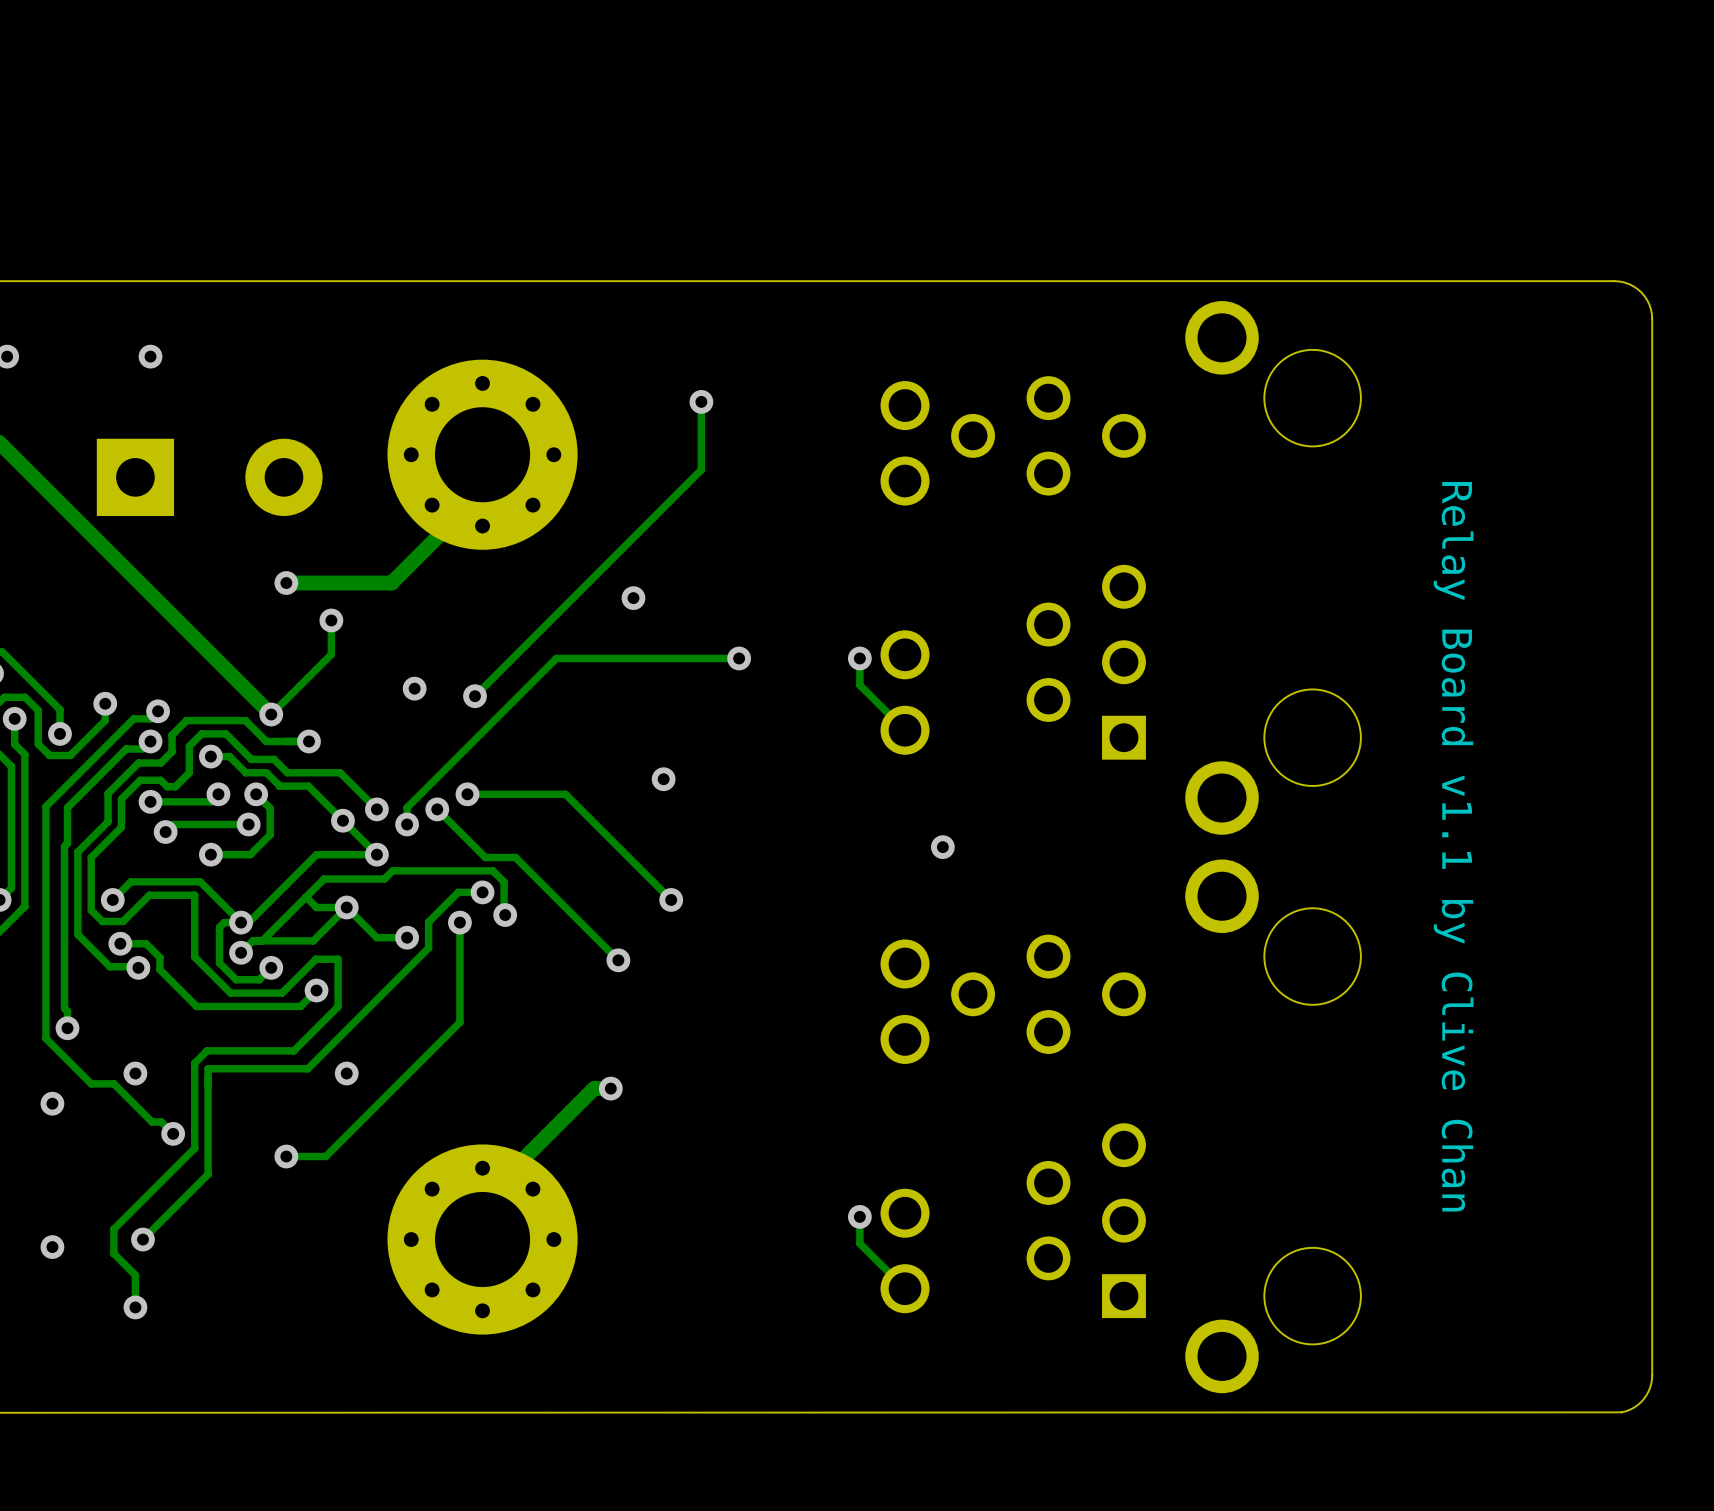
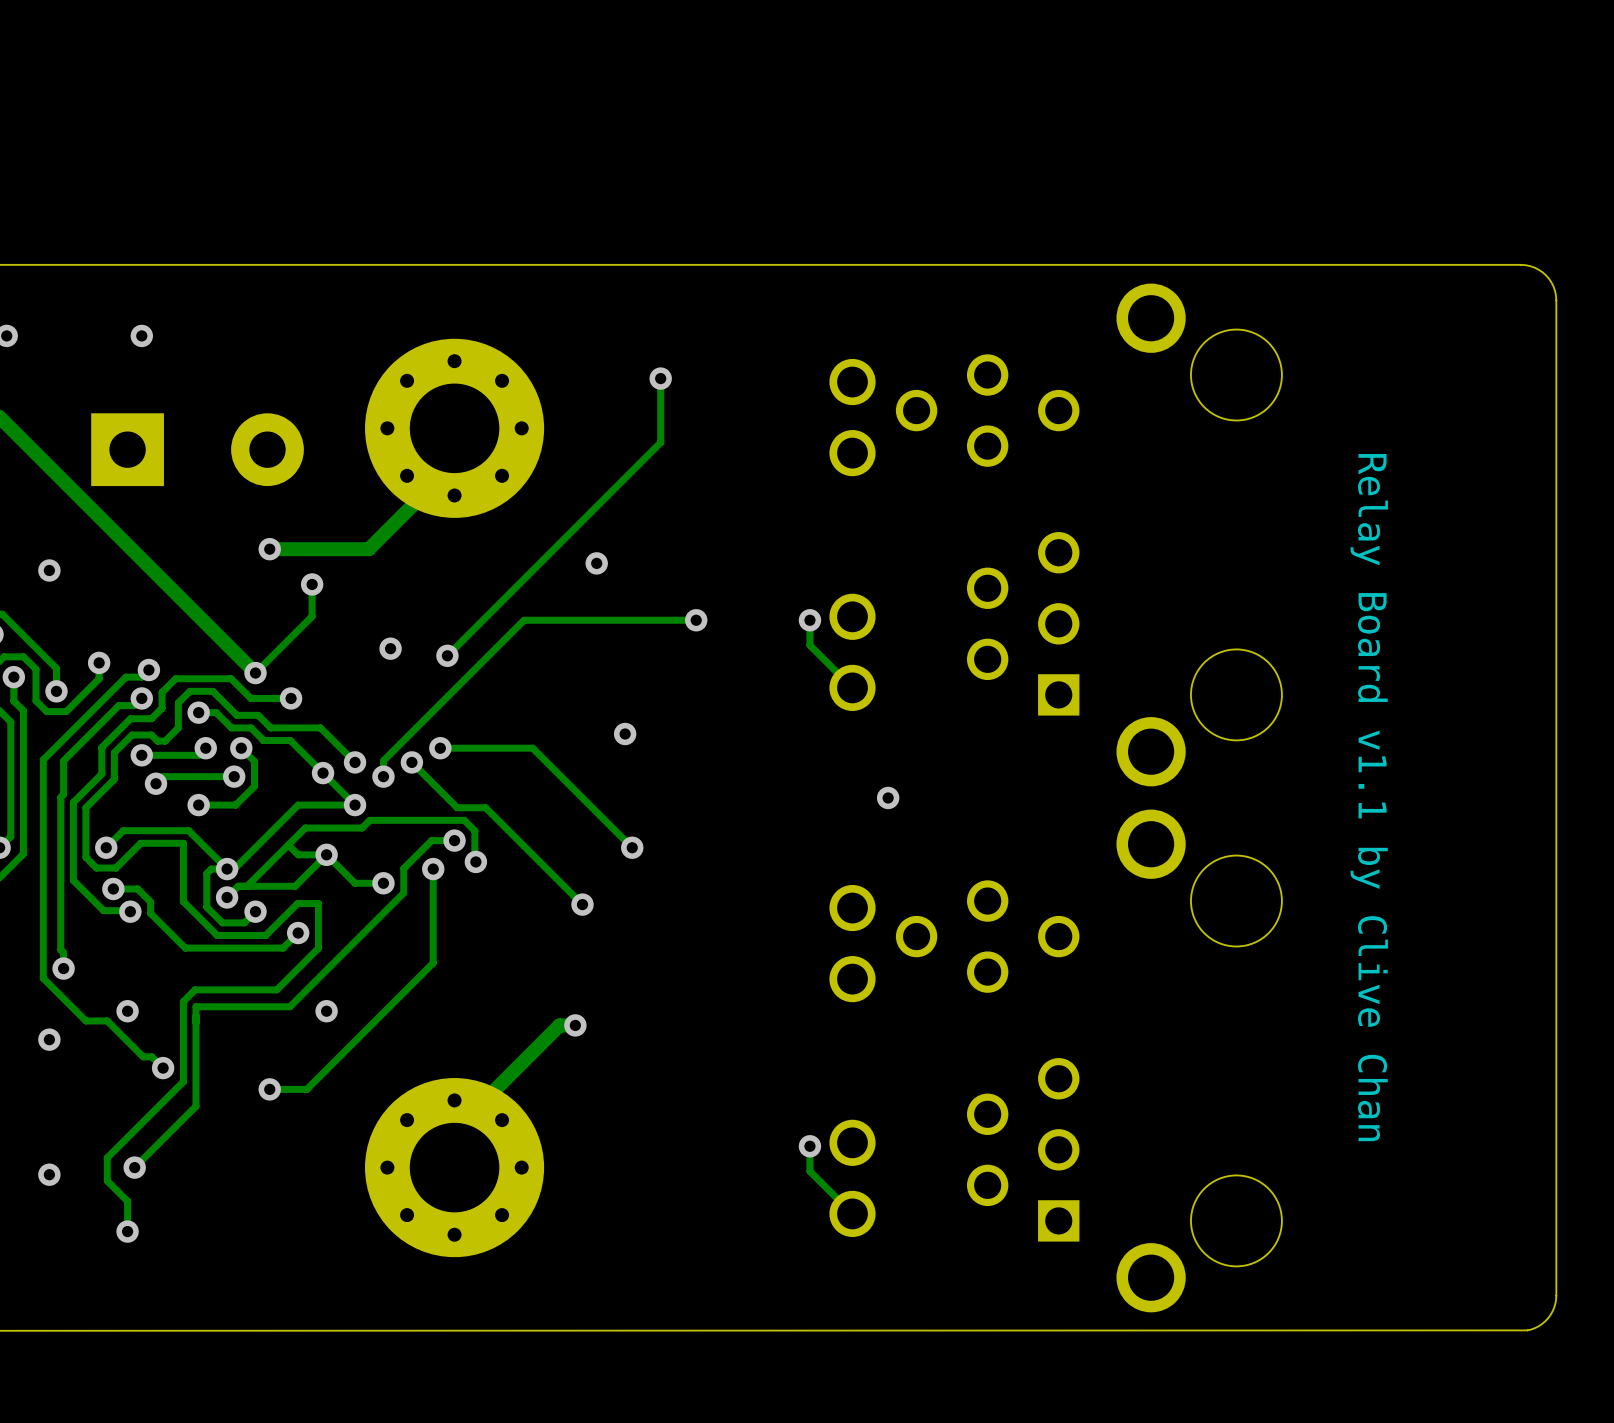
via: none -> (49, 570)

